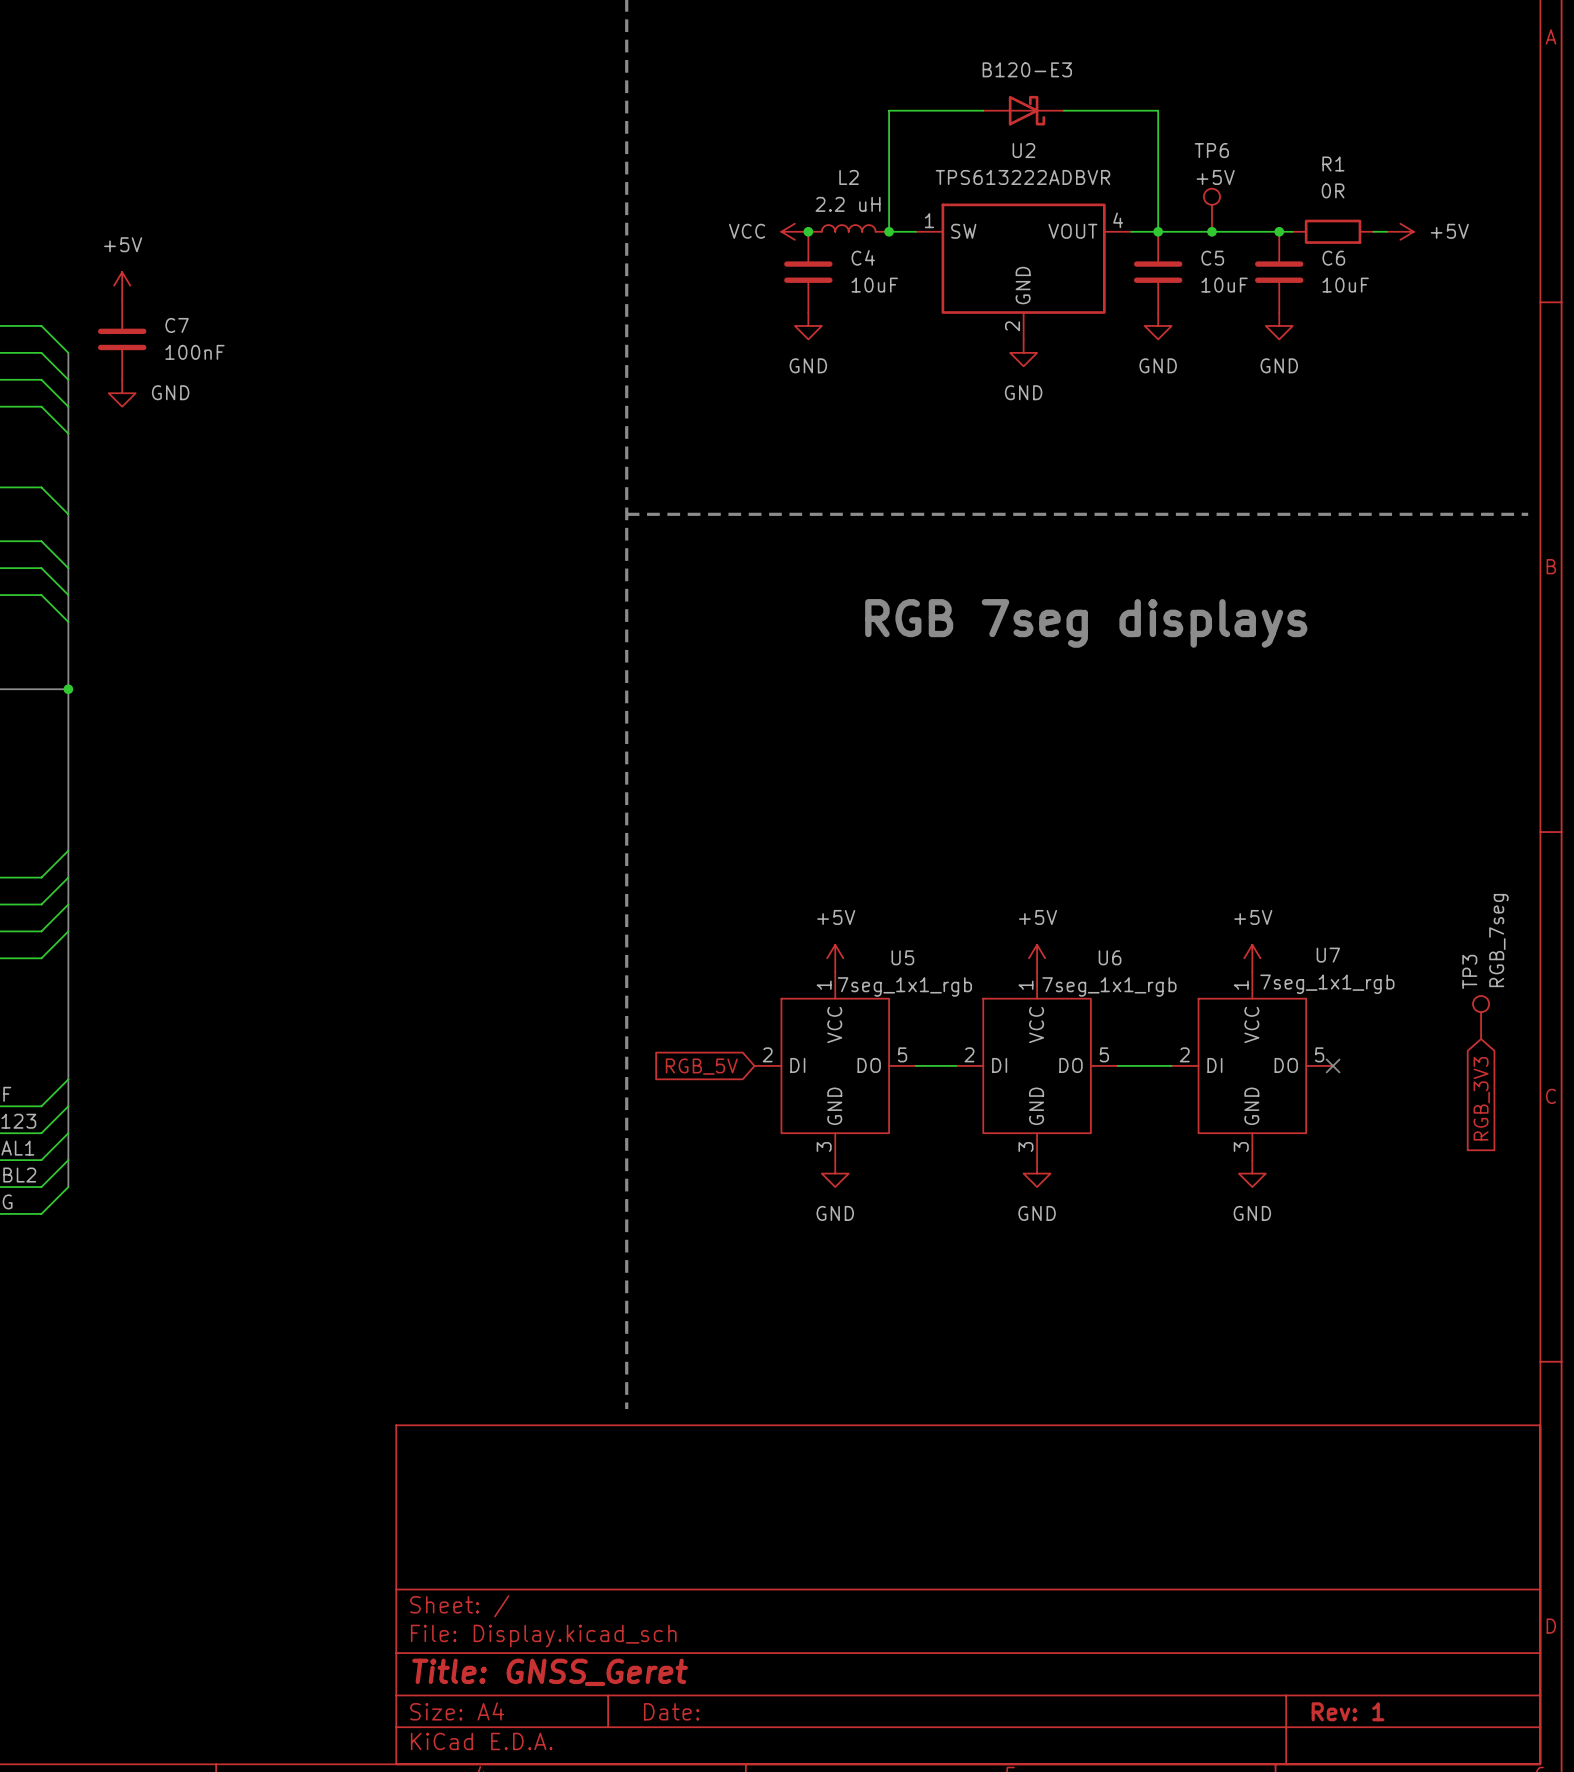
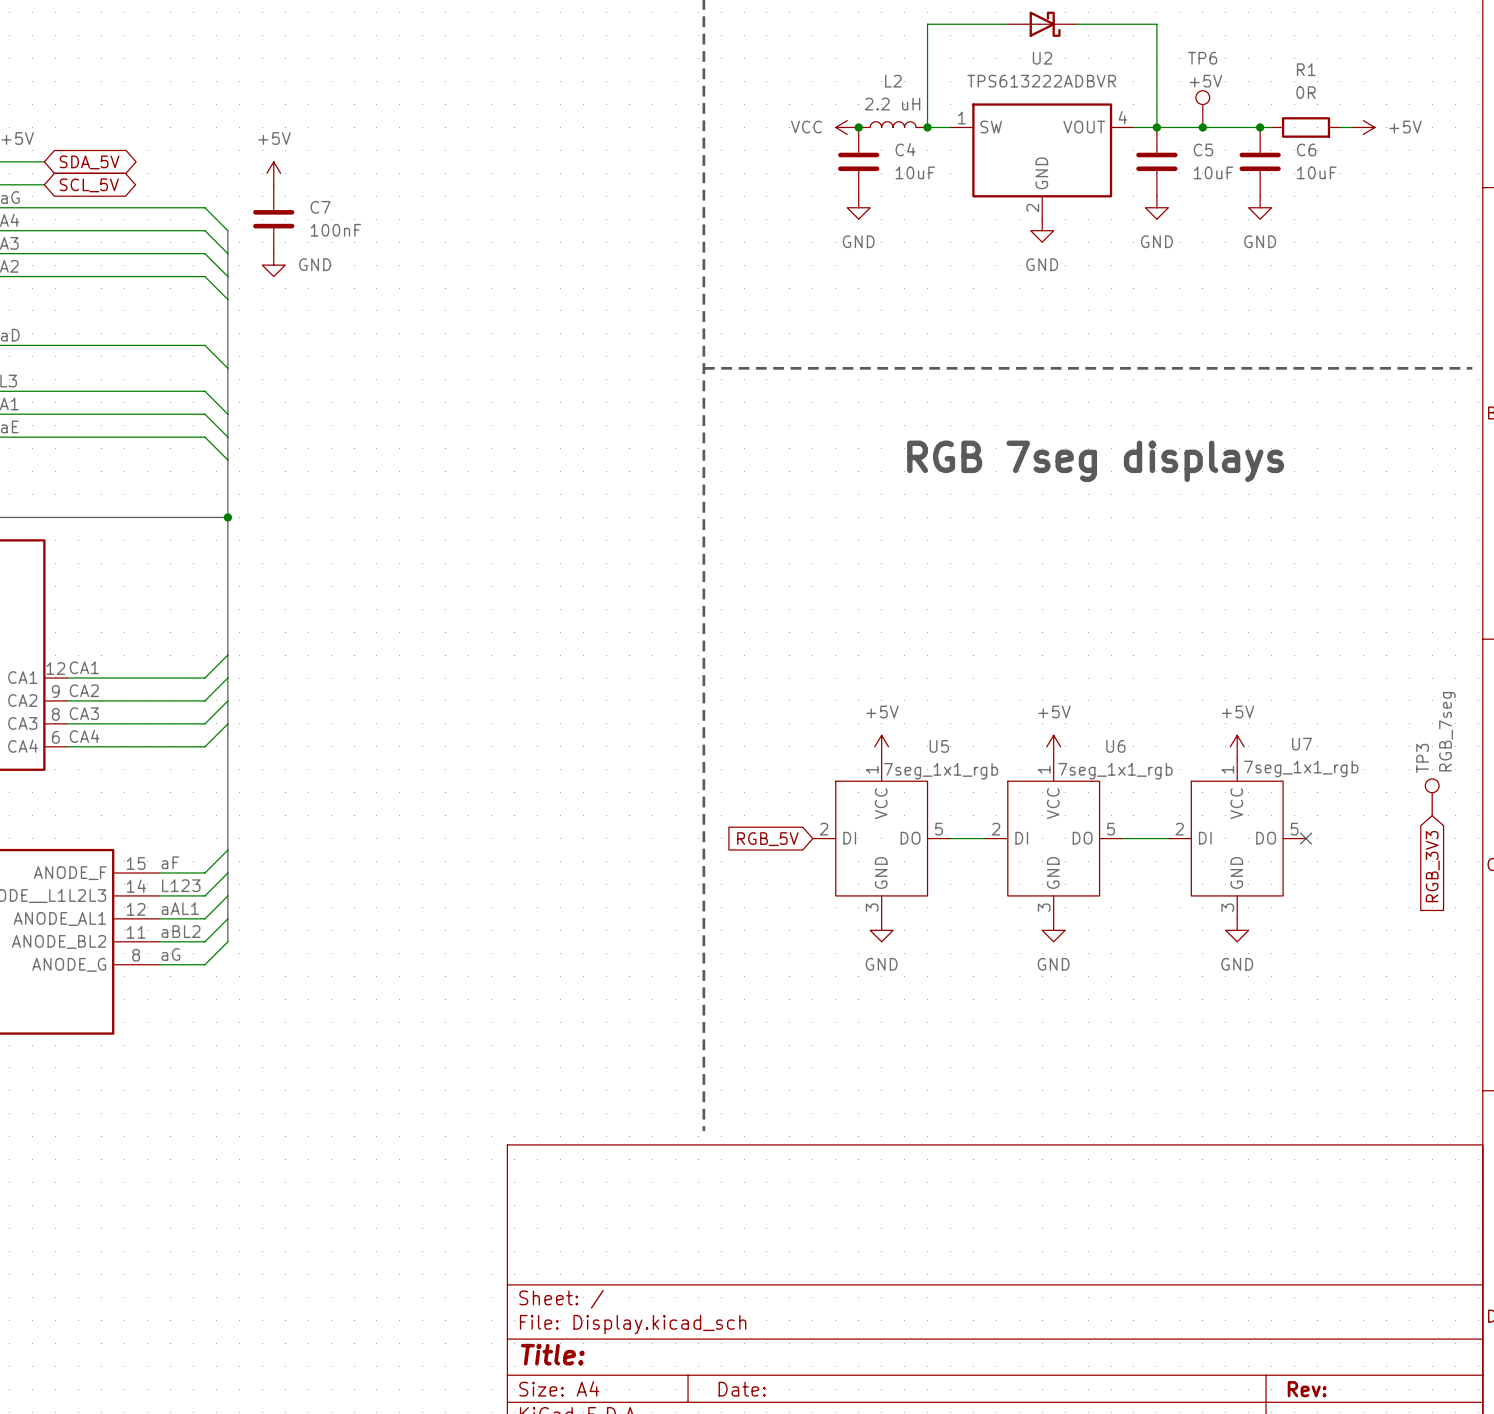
title block: Title: GNSS_Geret (550, 1672) -> Title: (552, 1354)
title block: Rev: 1 (1348, 1711) -> Rev: (1307, 1389)

